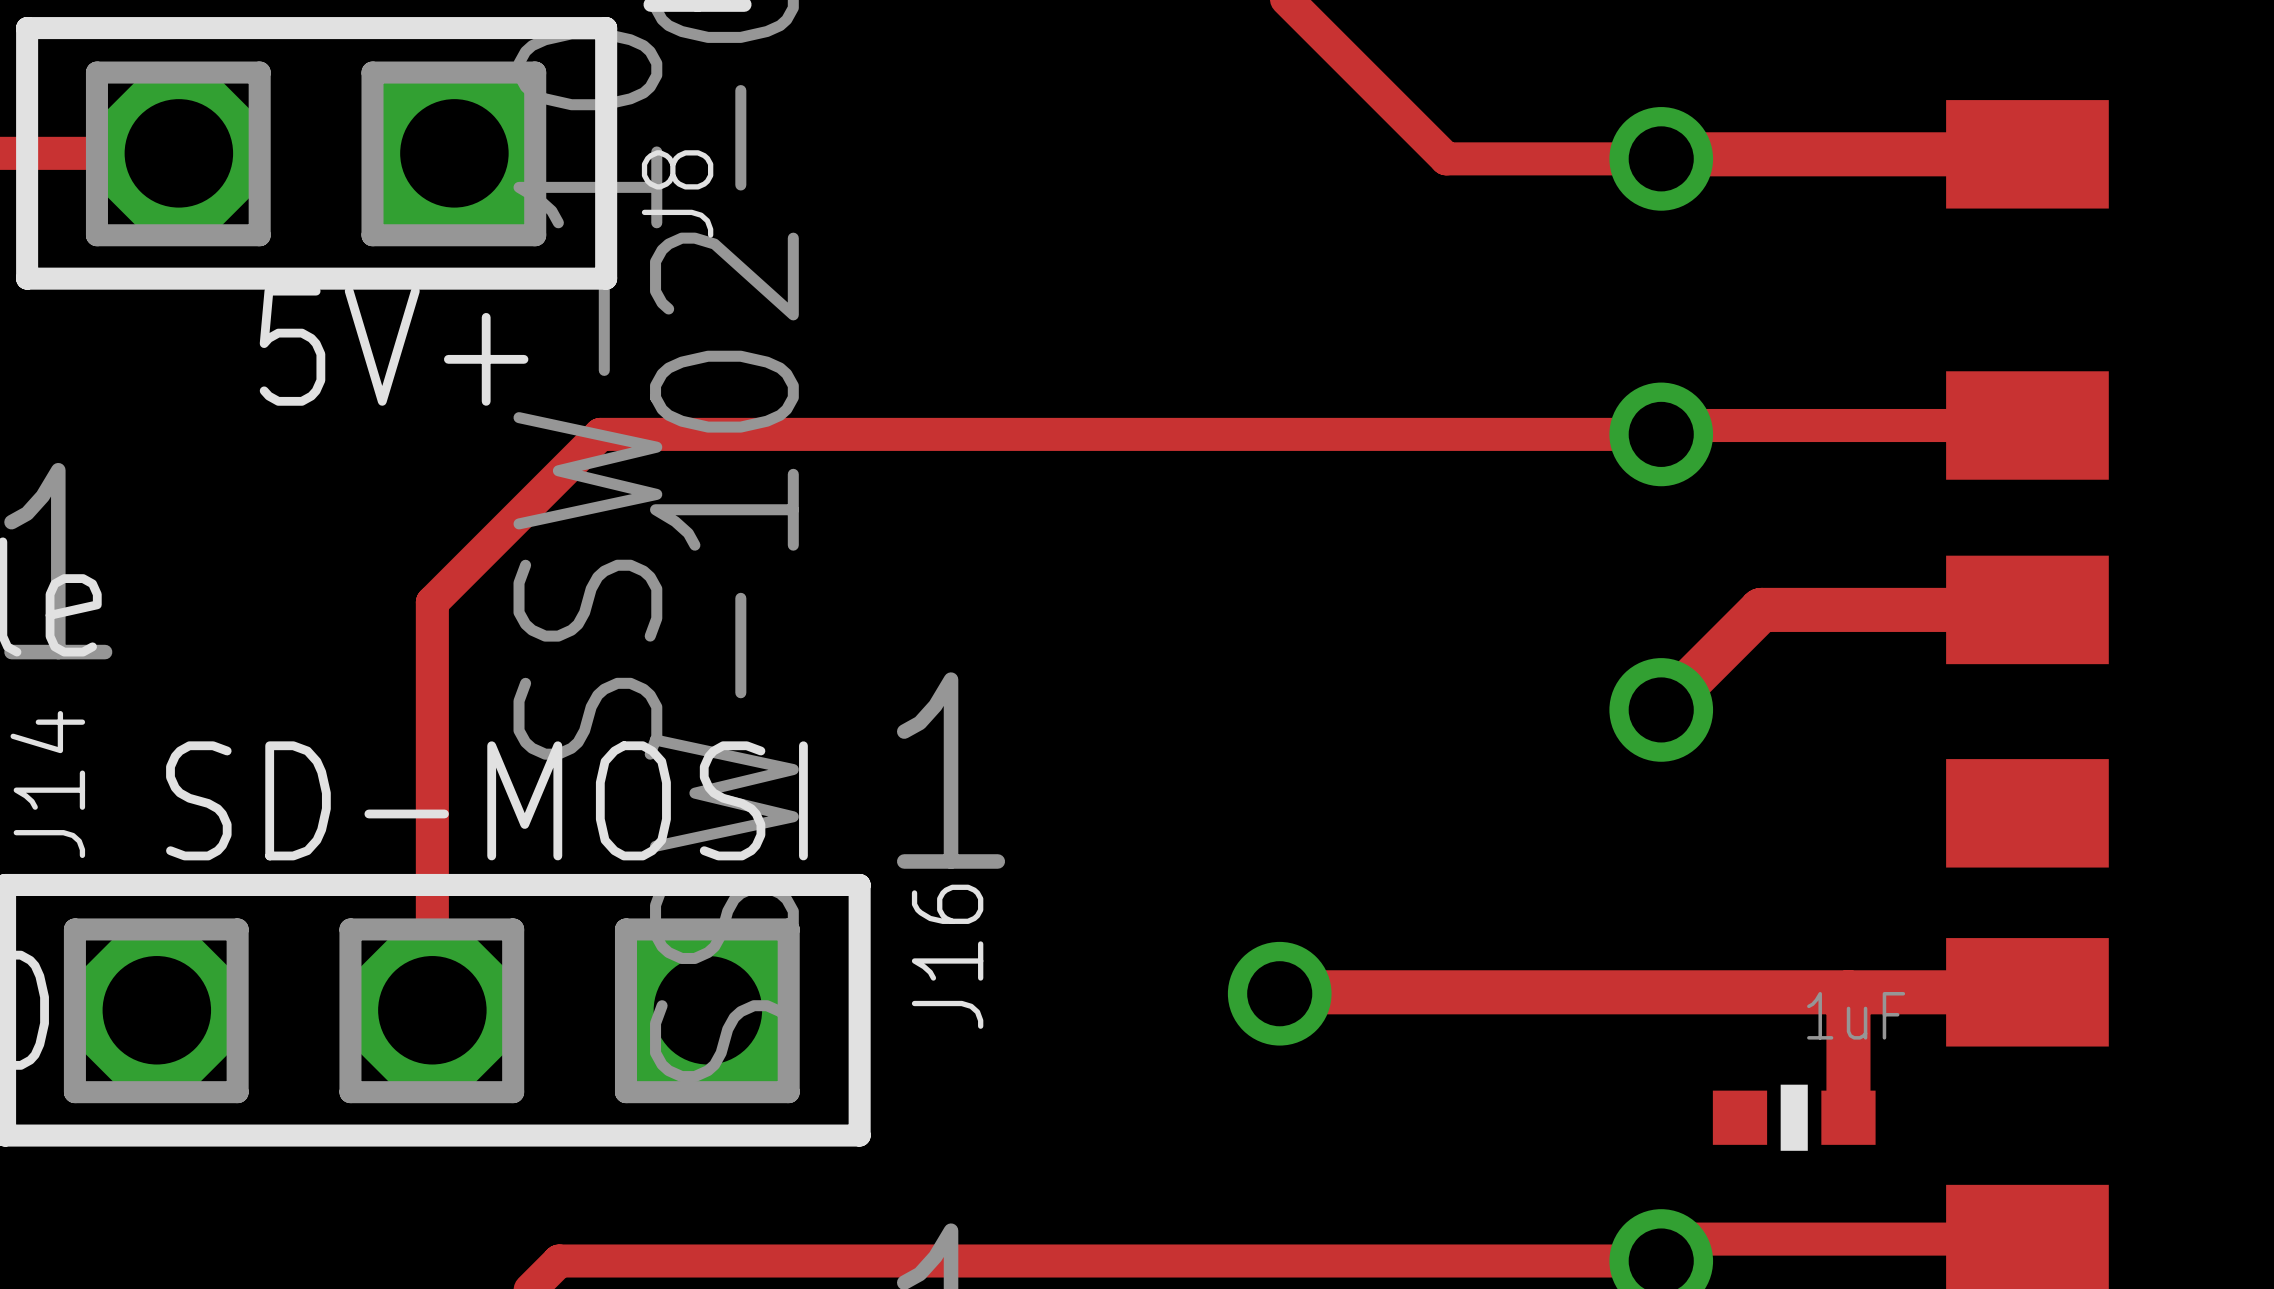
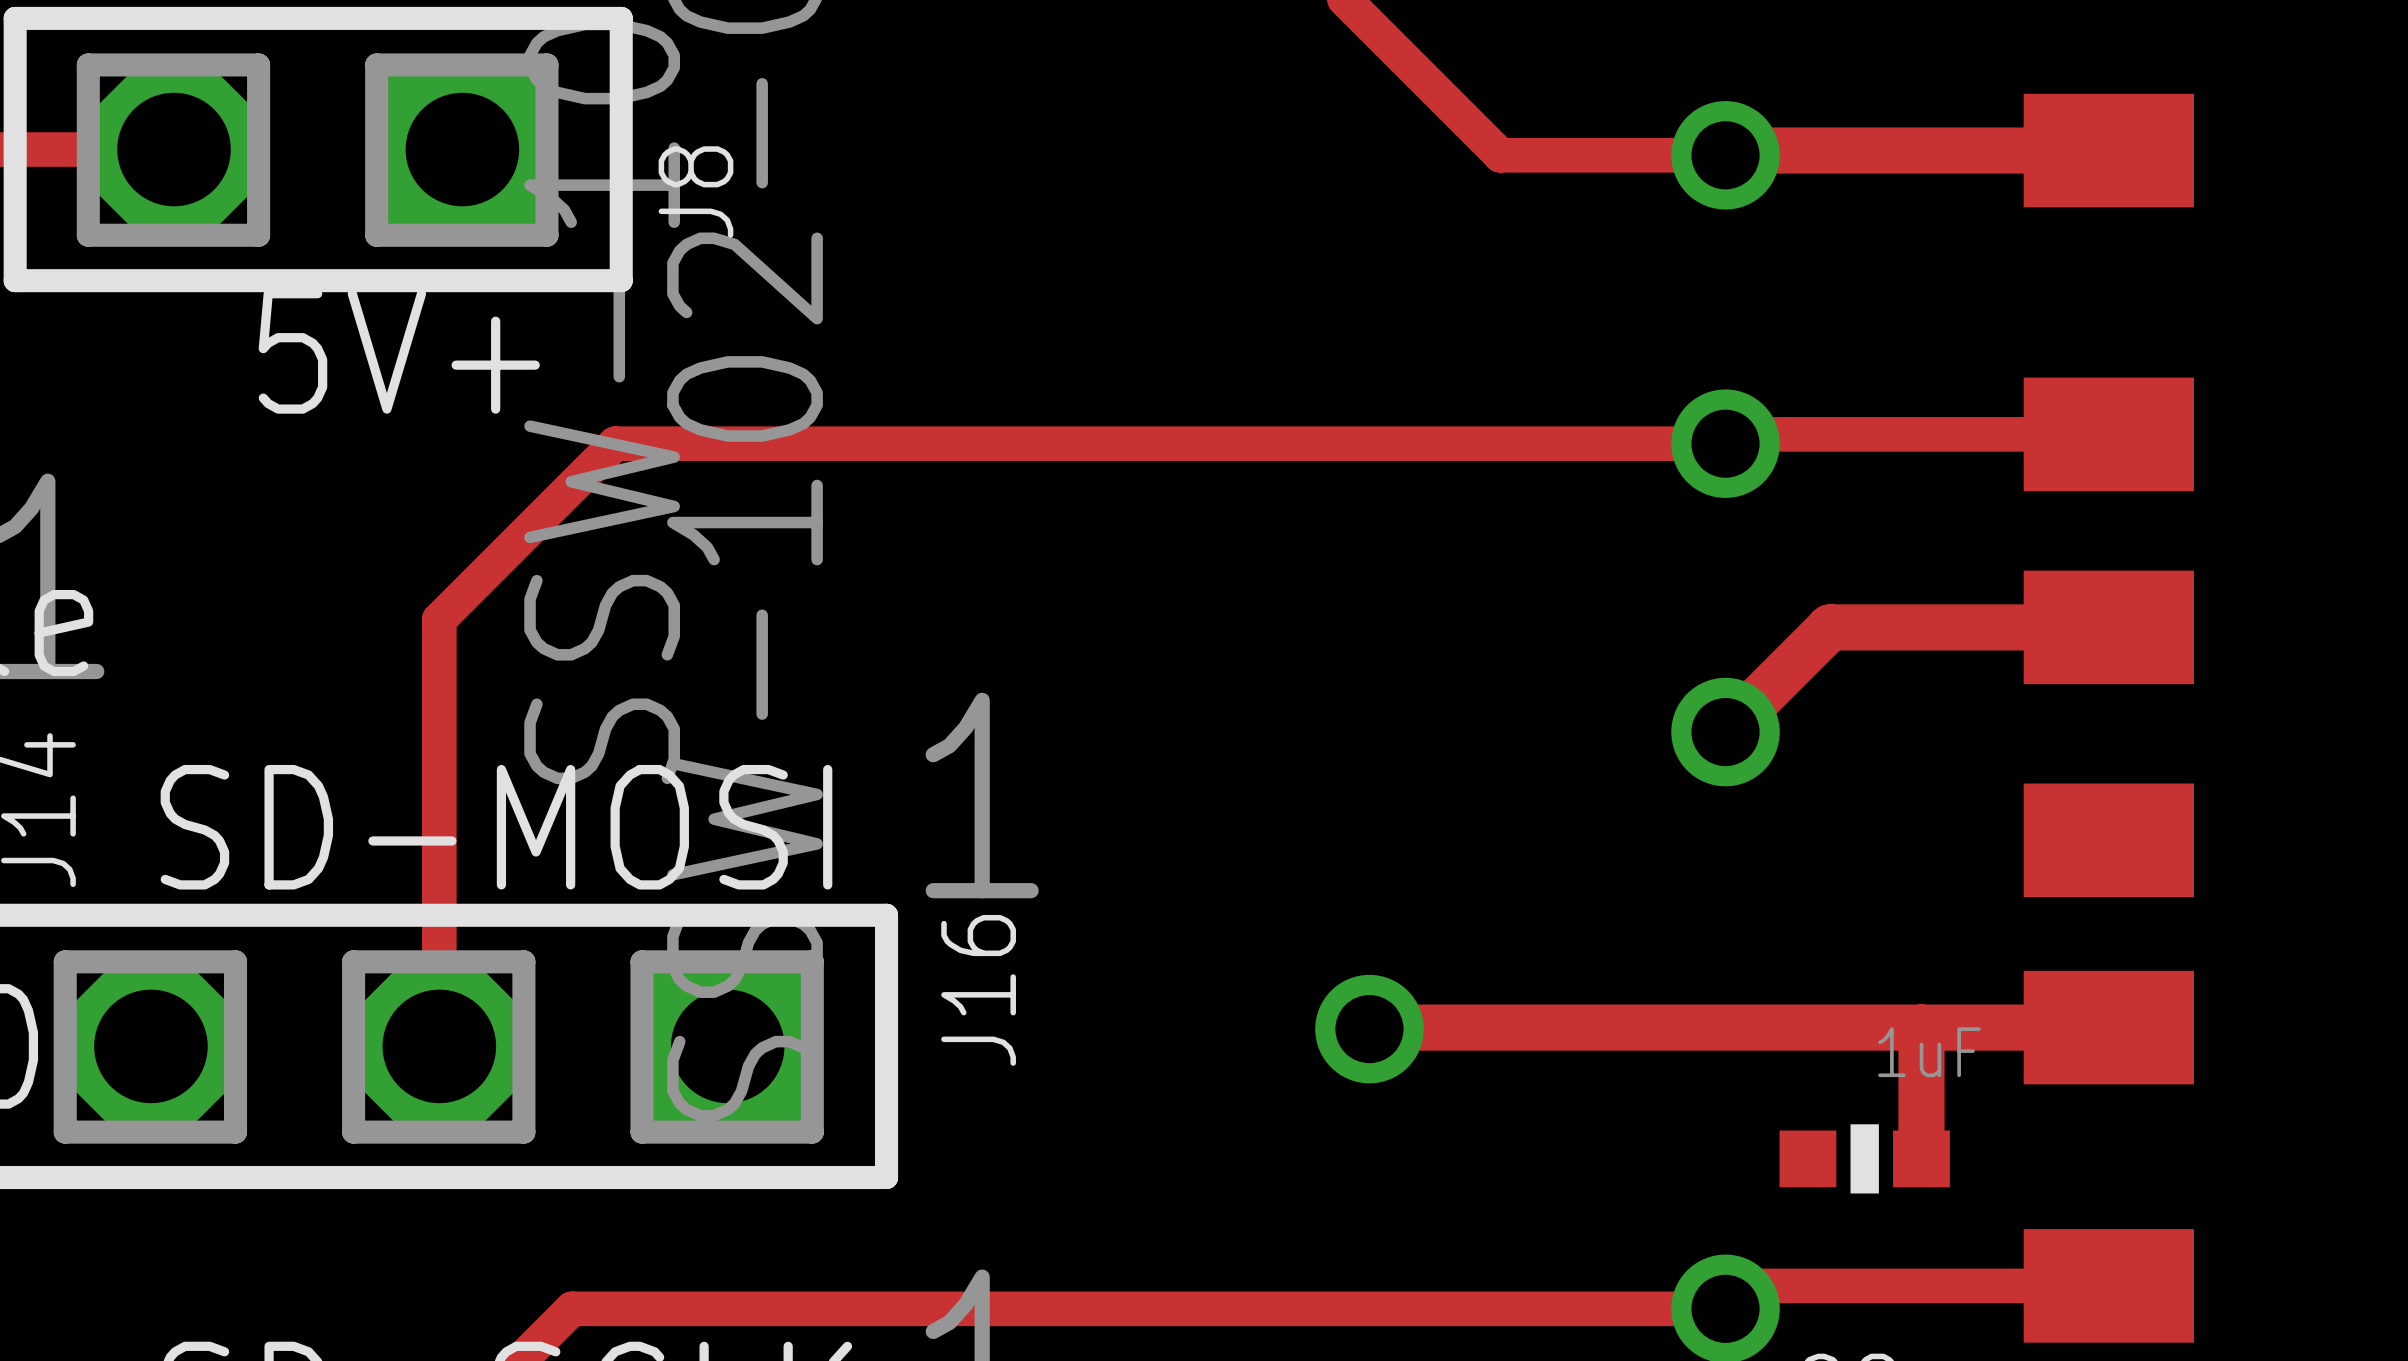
via position: (1279, 993) -> (1369, 1029)

